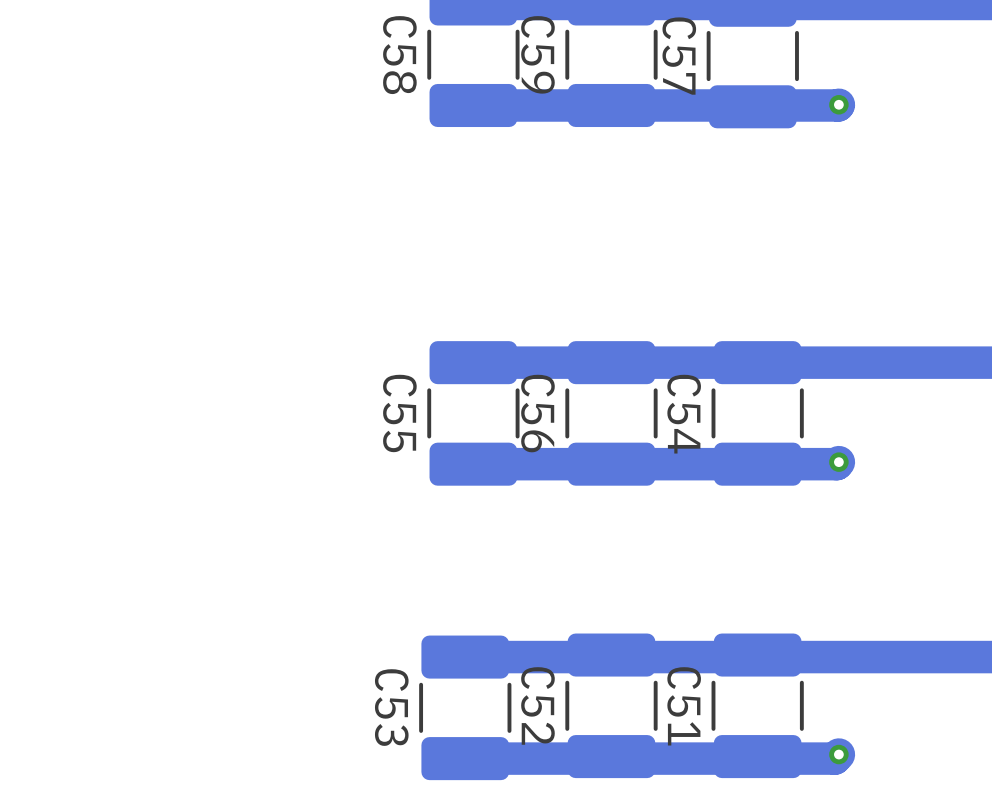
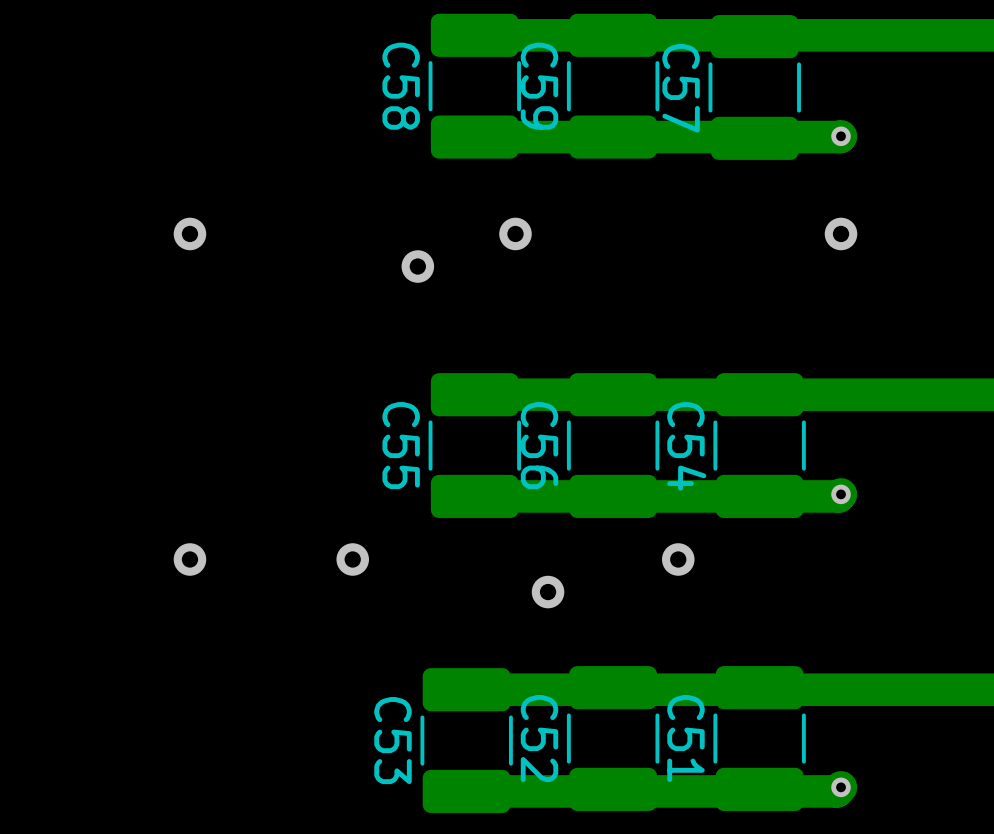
via: none -> (189, 233)
via: none -> (515, 233)
via: none -> (841, 233)
via: none -> (417, 266)
via: none -> (189, 559)
via: none -> (352, 559)
via: none -> (678, 559)
via: none -> (548, 592)

